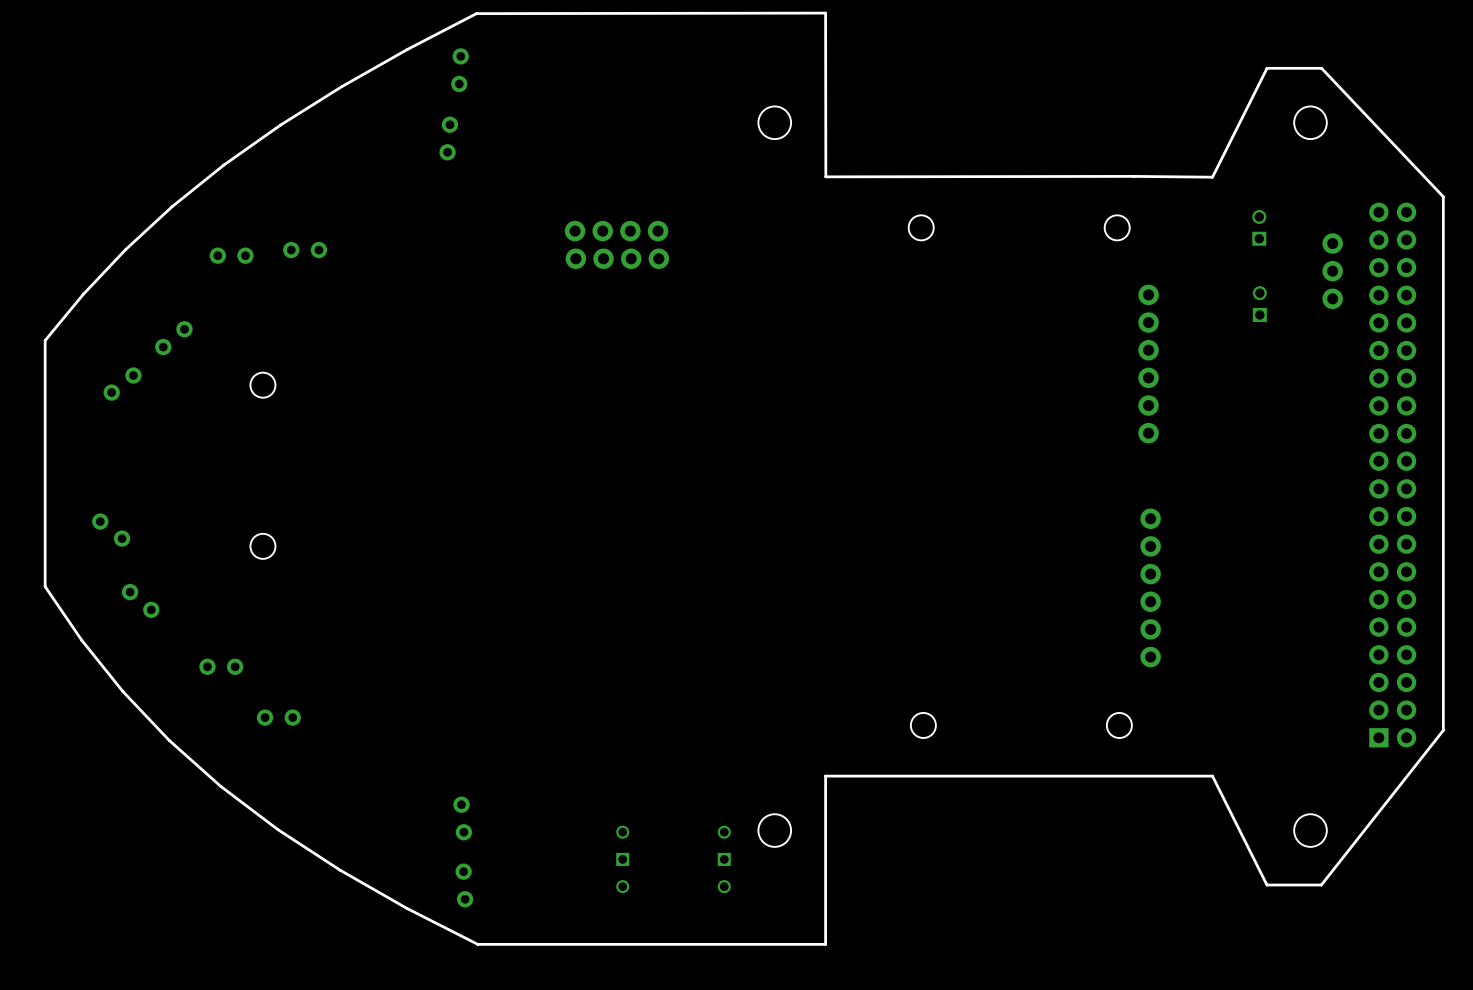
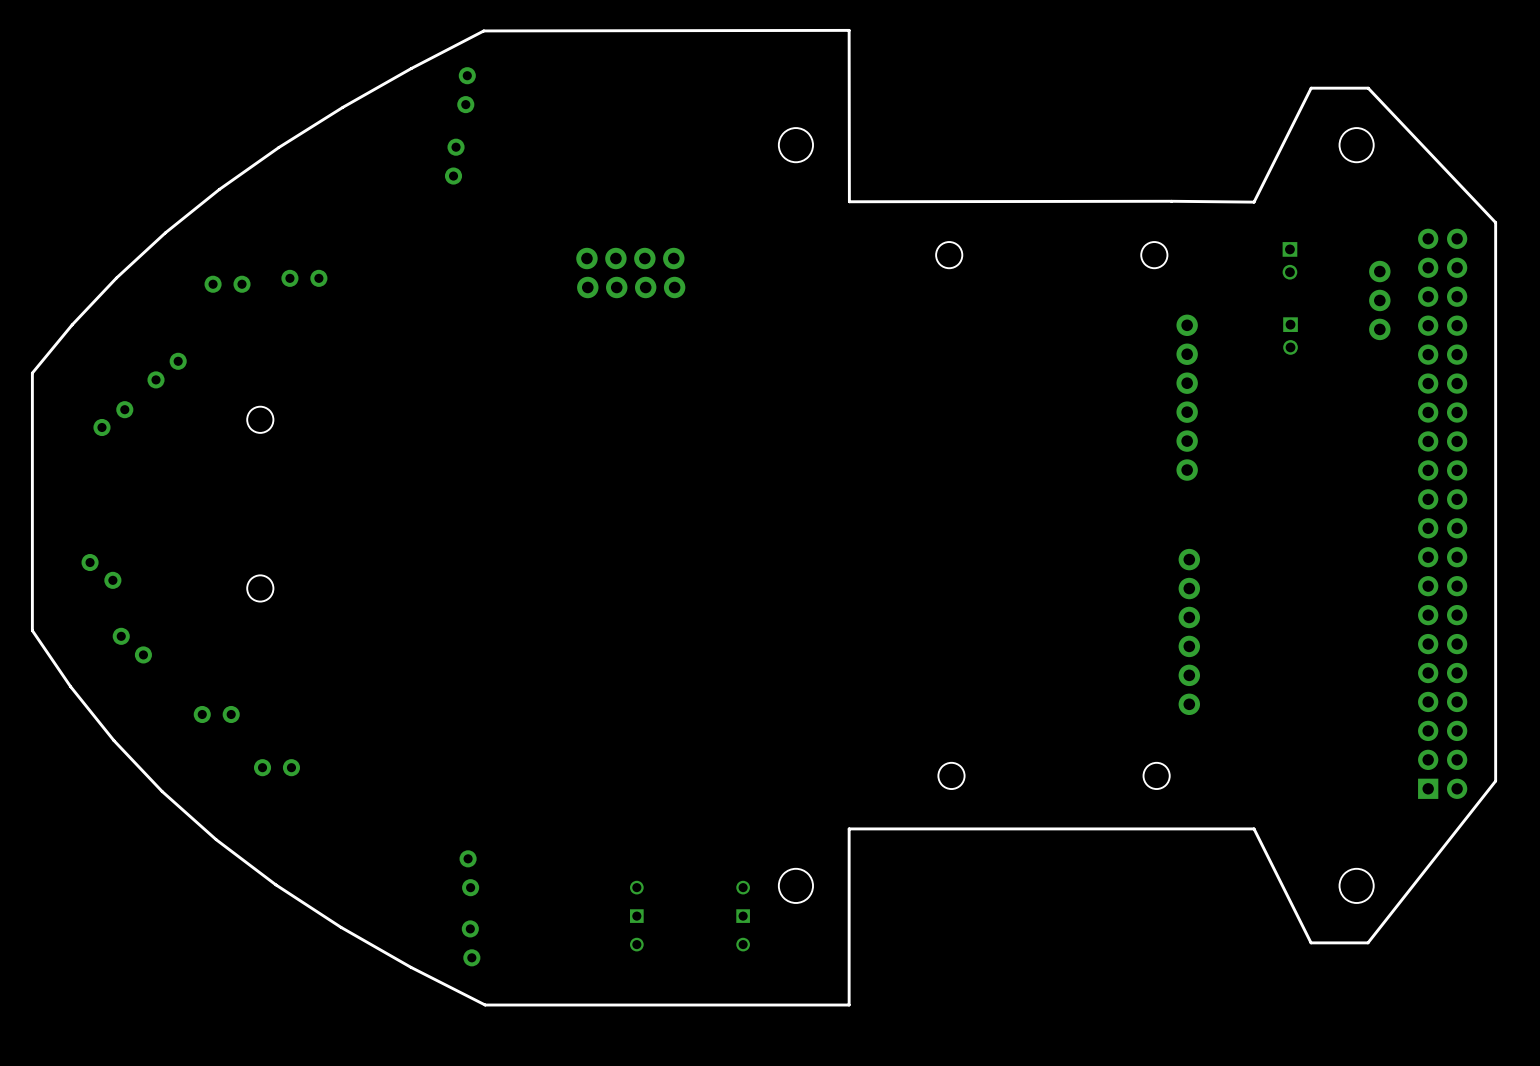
part rotation: 0° (1259, 227) -> 180° (1289, 260)
part rotation: 0° (1259, 304) -> 180° (1290, 336)

